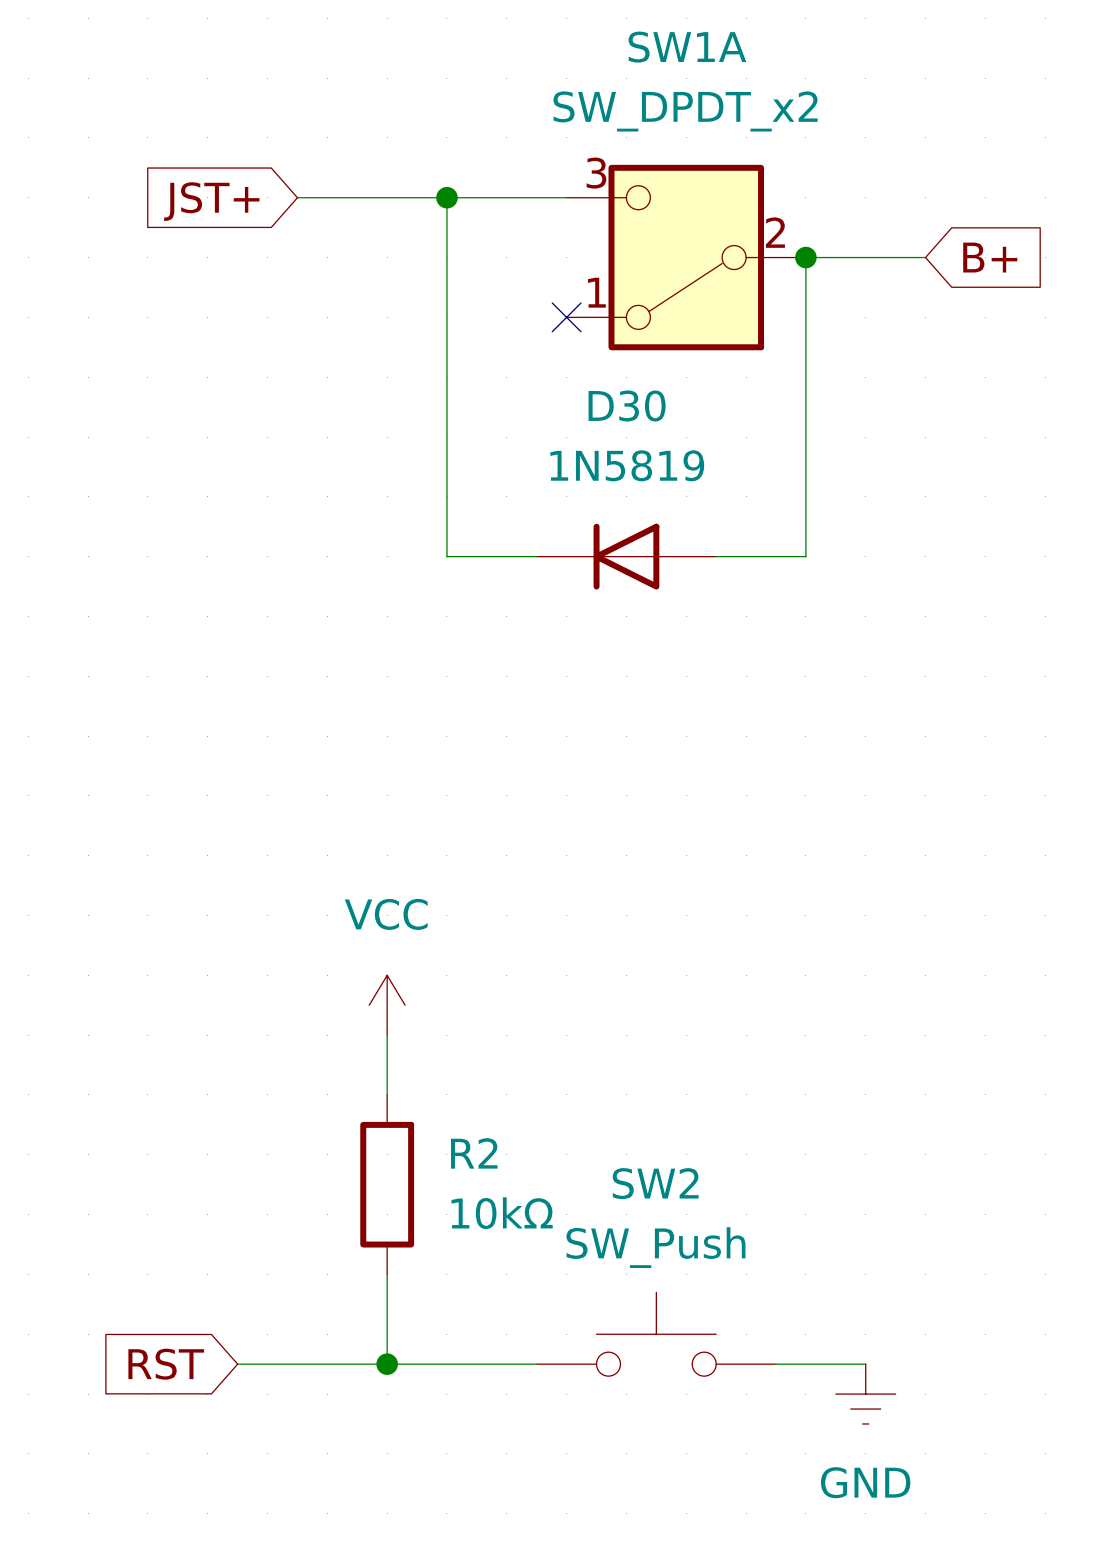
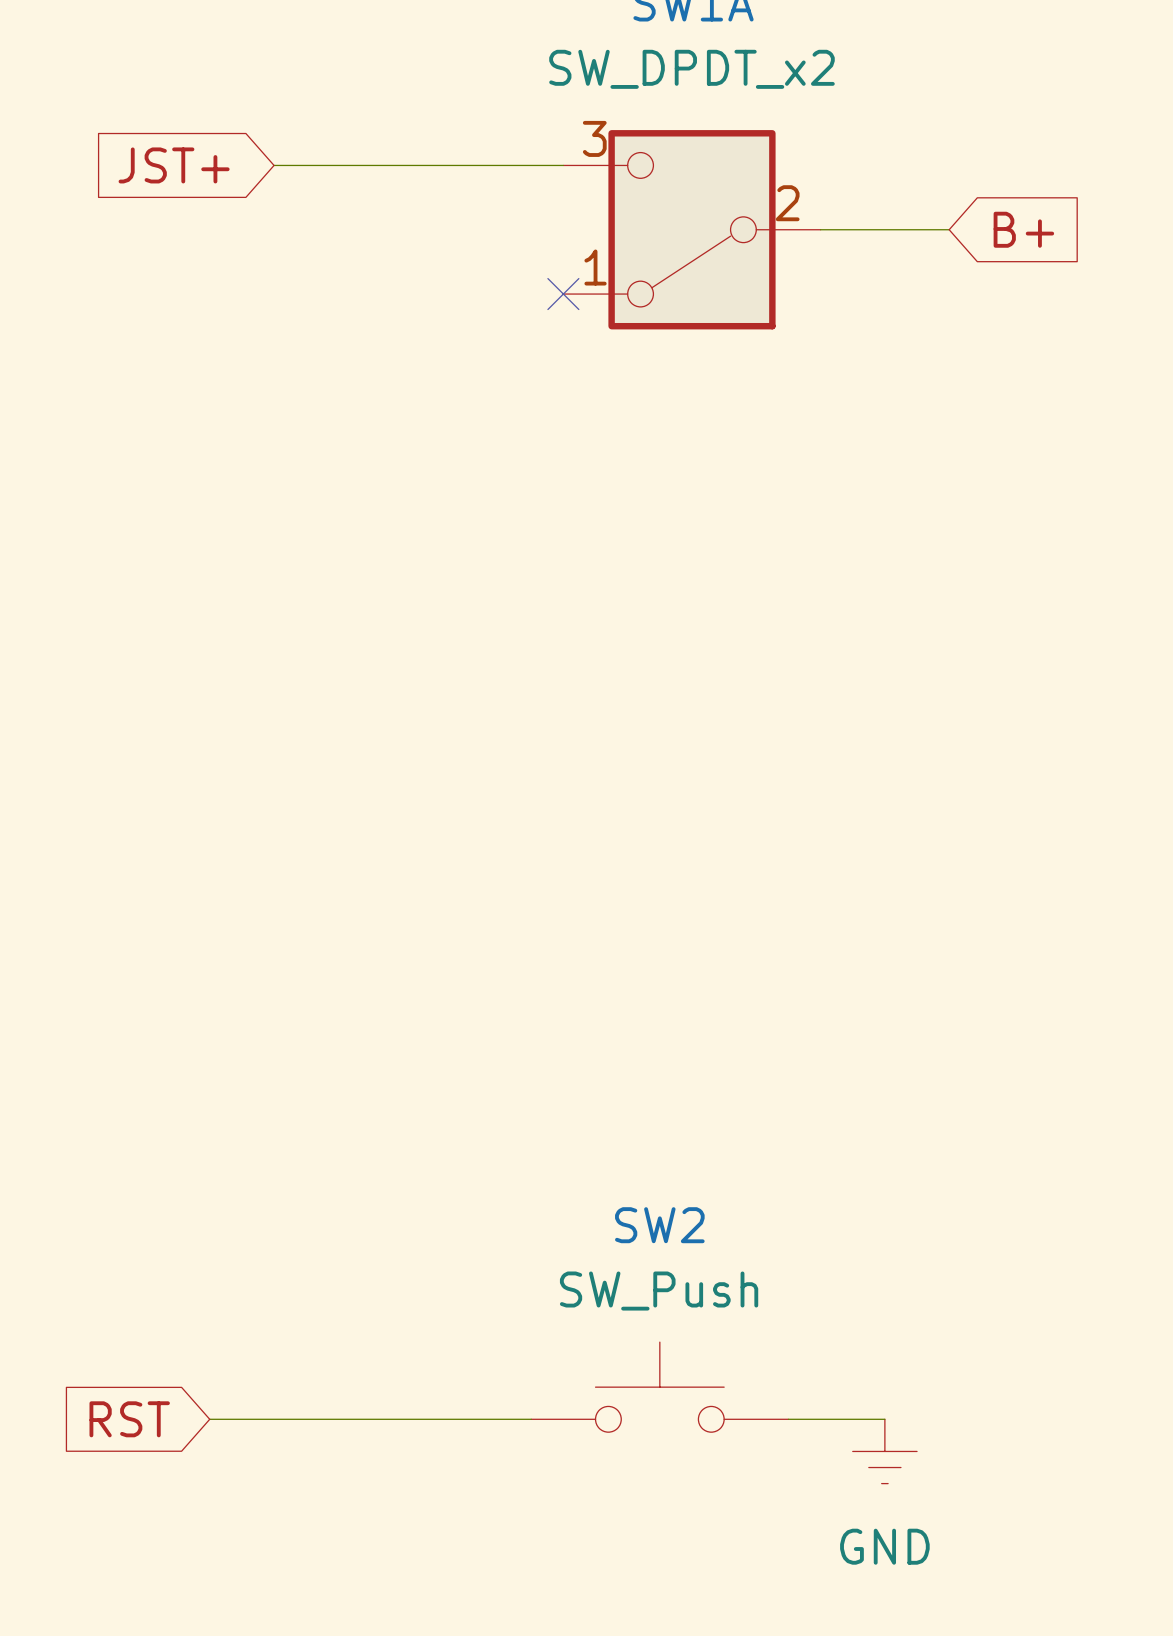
wire: (446, 197) (446, 556) (536, 556) -> none
junction: (446, 197) -> none
wire: (805, 257) (805, 556) (716, 556) -> none
junction: (805, 257) -> none
D30: 1N5819 (626, 556) -> none
power symbol: VCC (387, 1005) -> none
wire: (387, 1035) (387, 1094) -> none
R2: 10kΩ (387, 1184) -> none
wire: (387, 1274) (387, 1364) -> none
junction: (387, 1364) -> none

